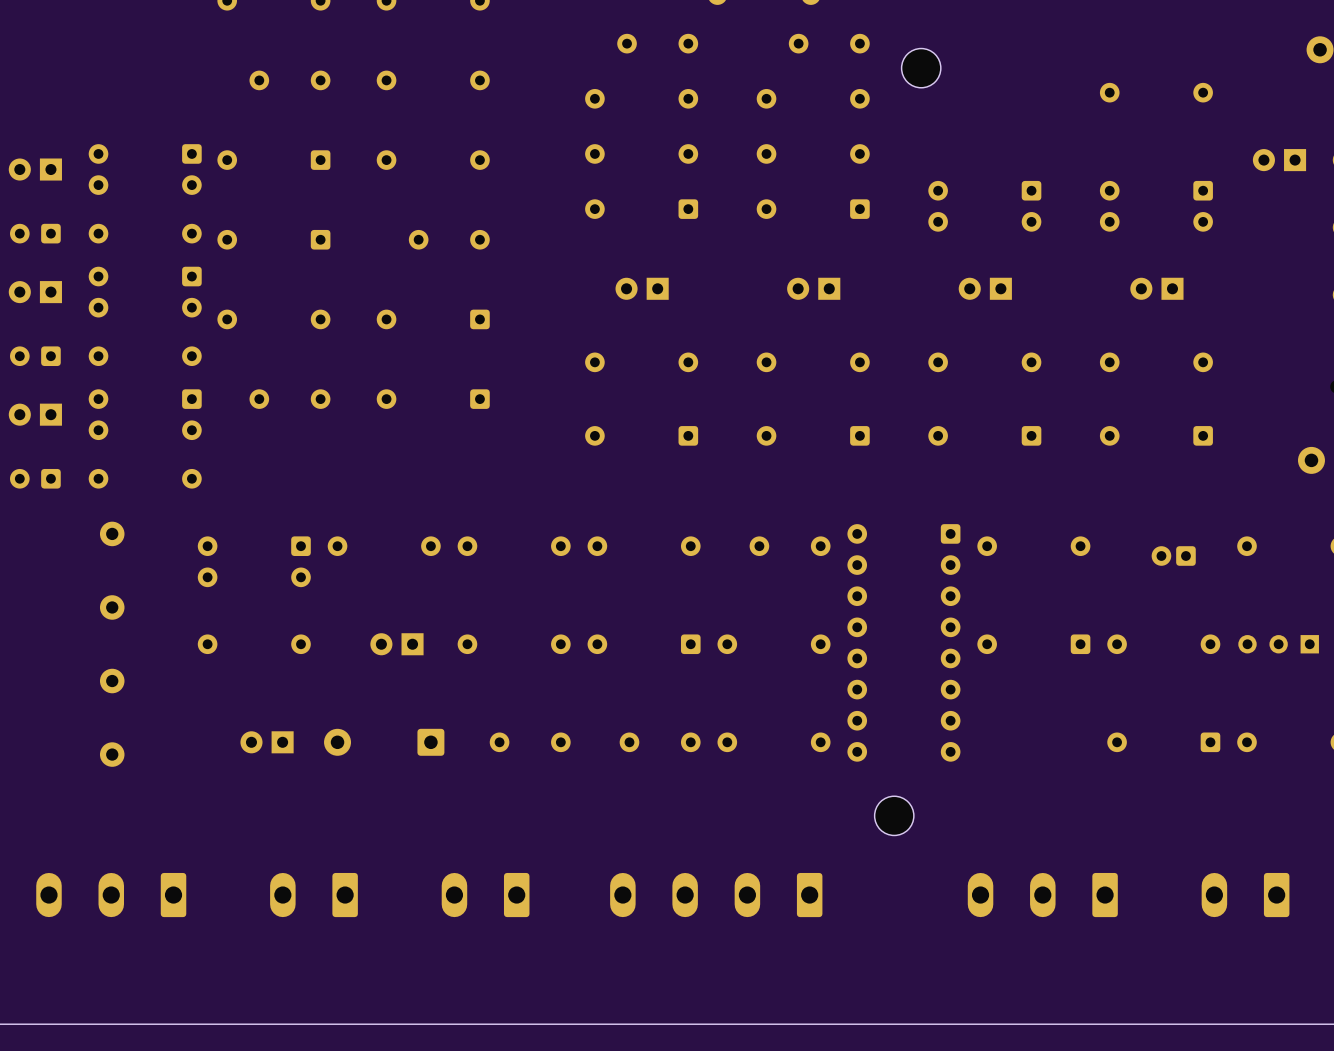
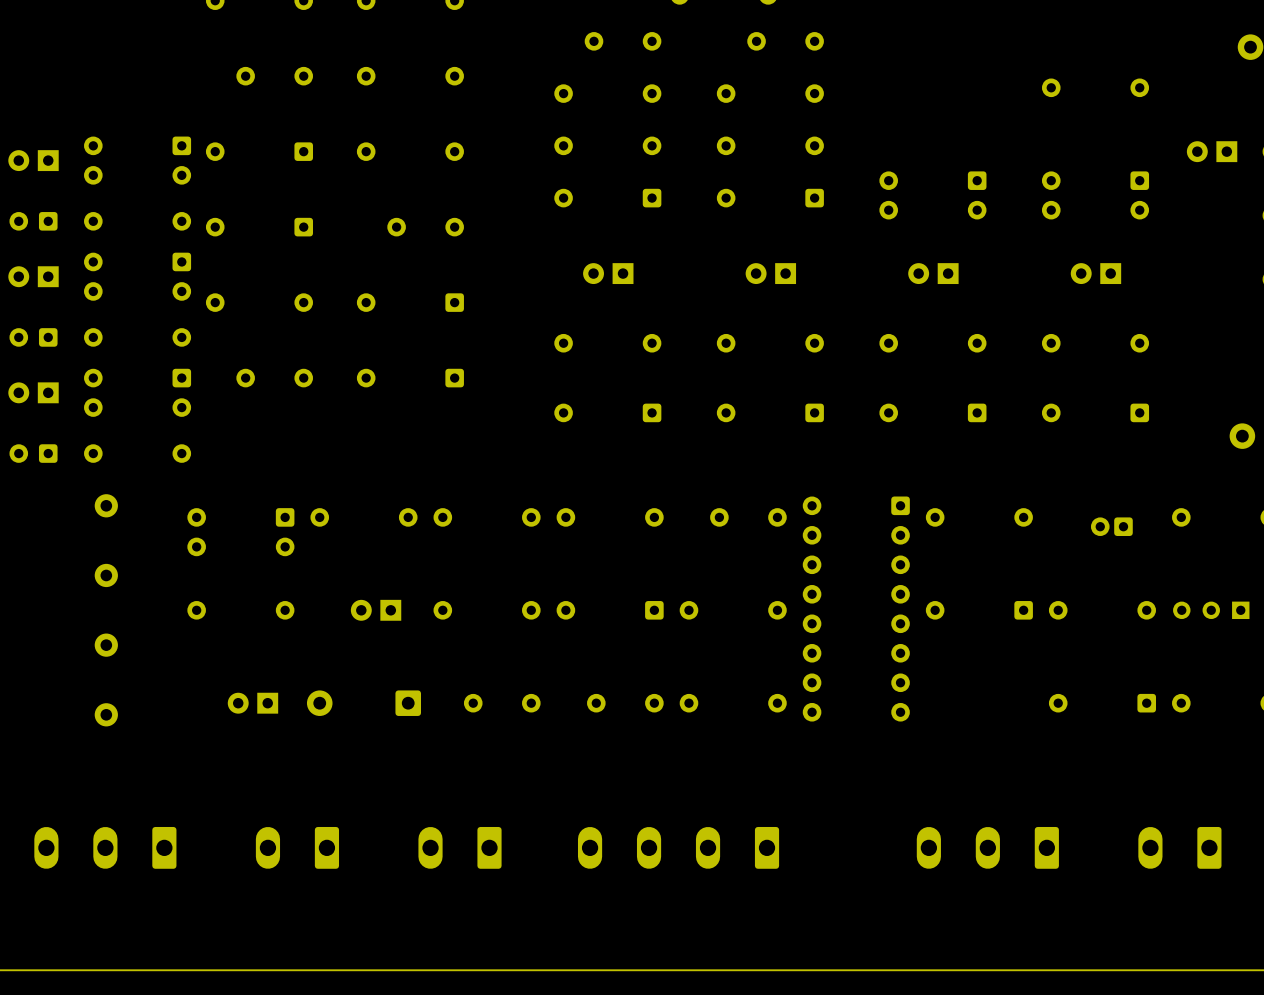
part: (921, 68) -> none
part: (894, 815) -> none

